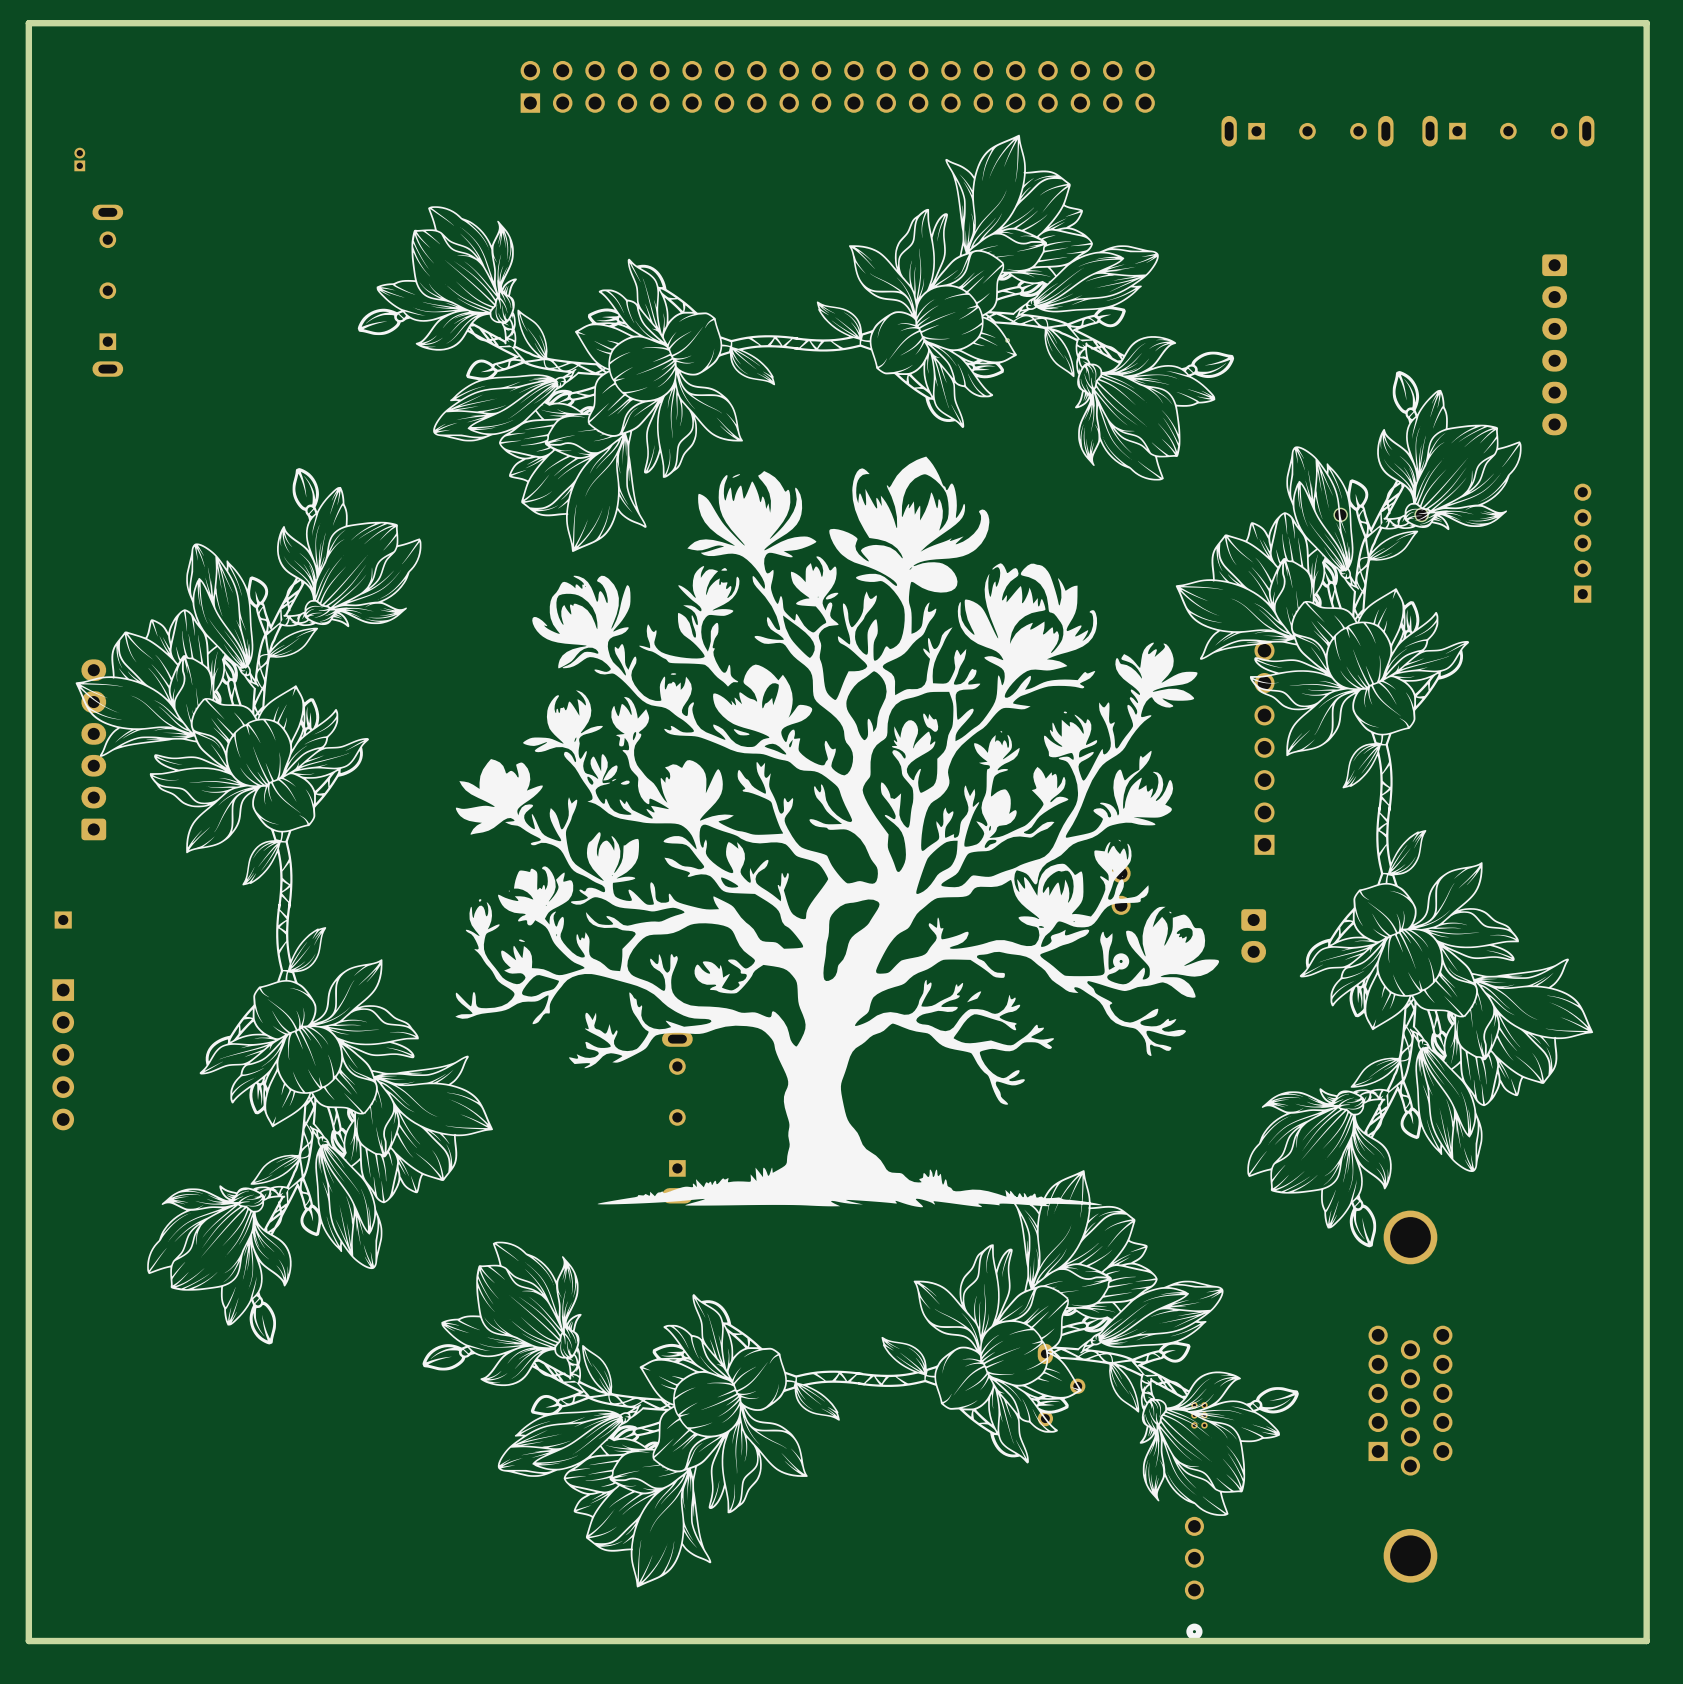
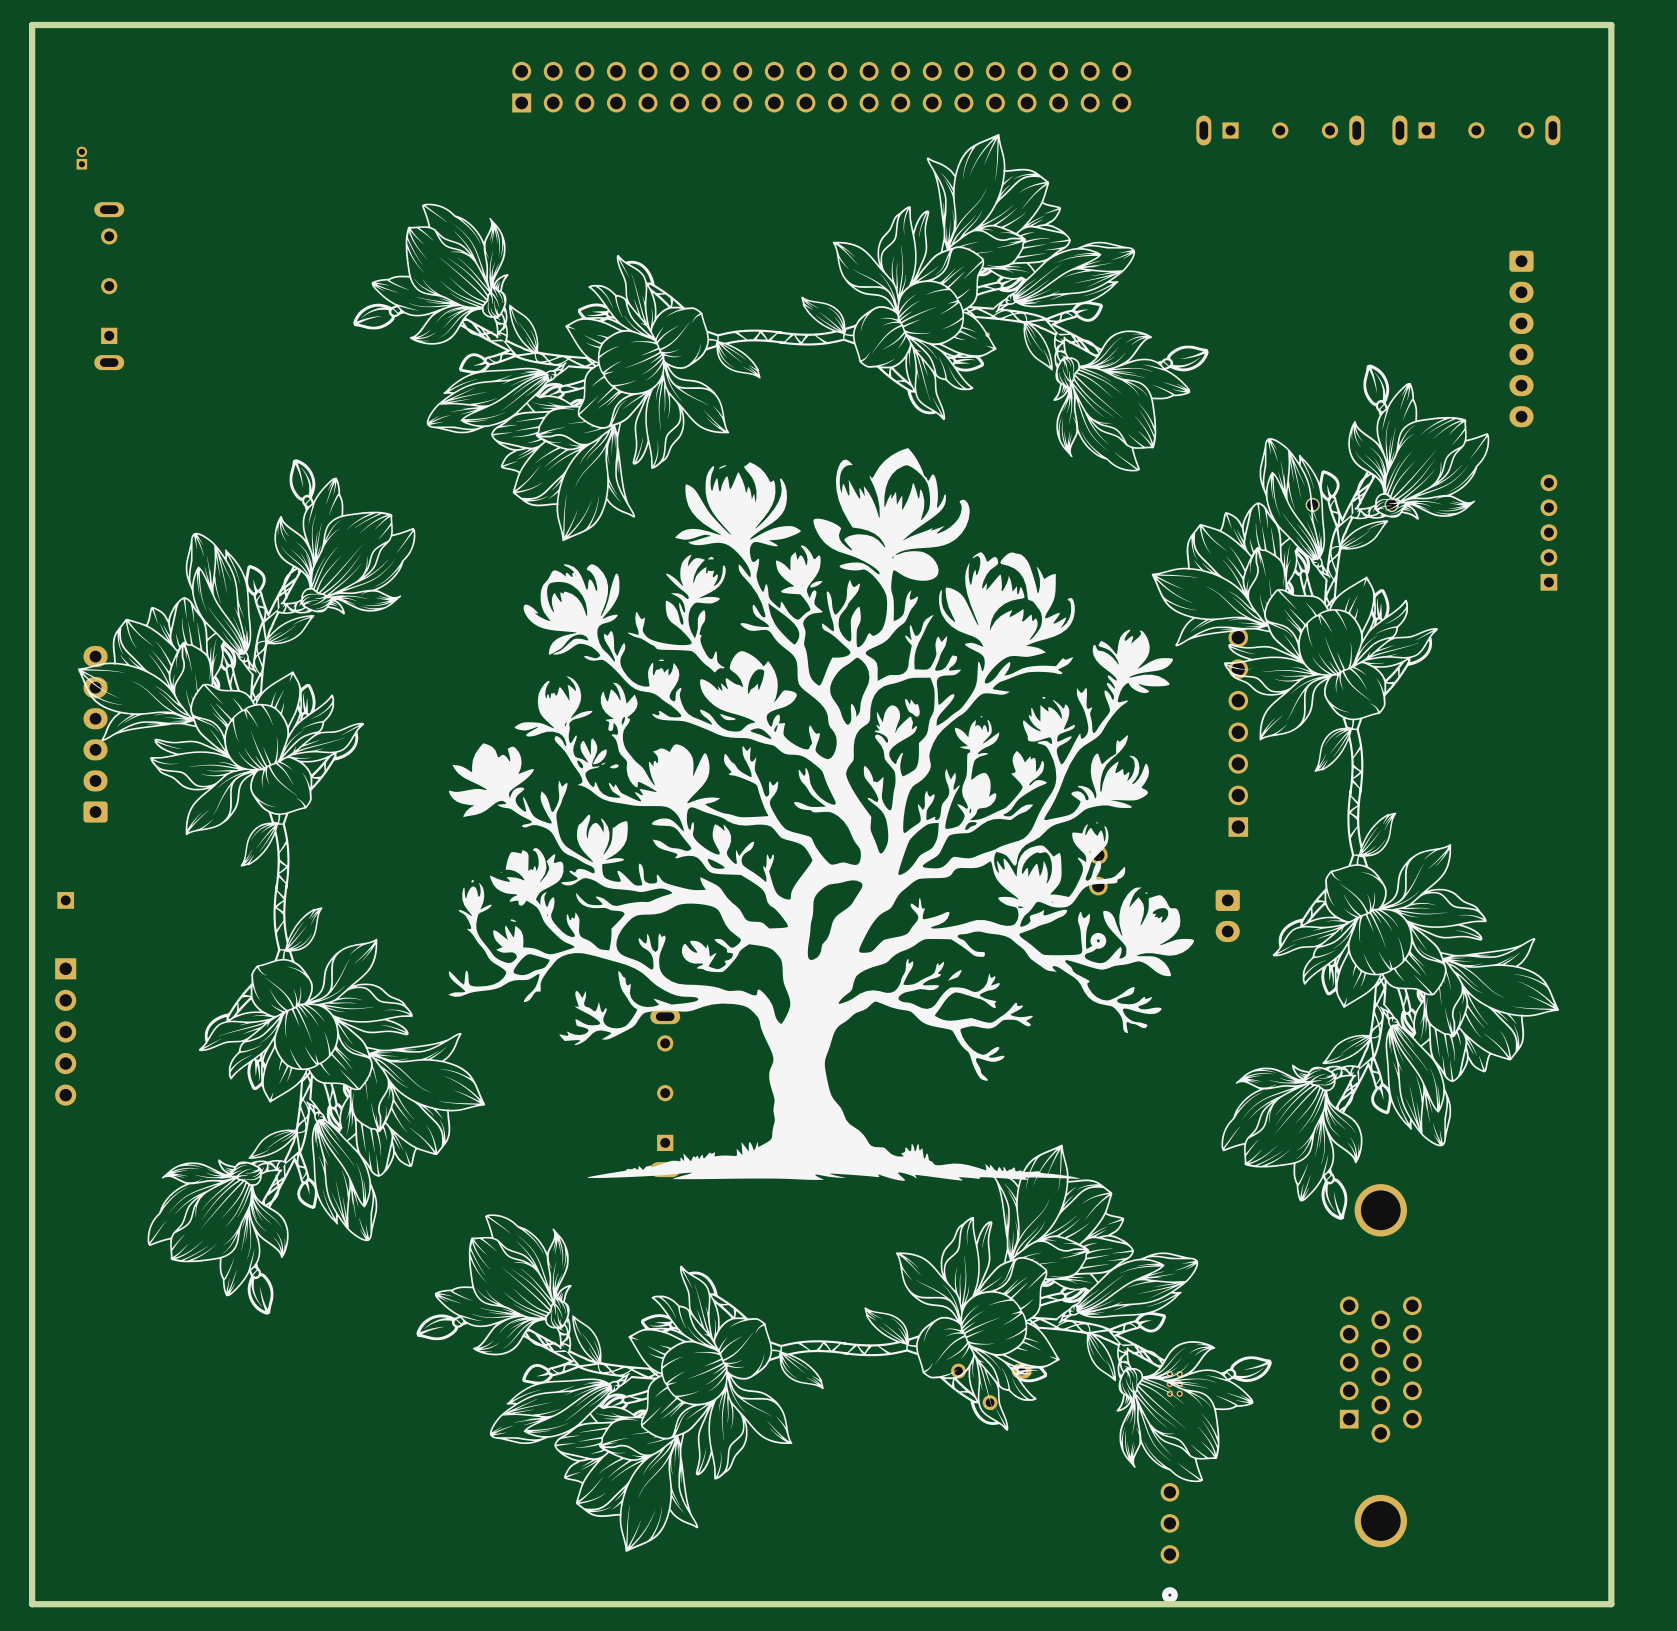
part rotation: 0° (1061, 1384) -> 90° clockwise (991, 1386)
part position: (1061, 1384) -> (991, 1386)

